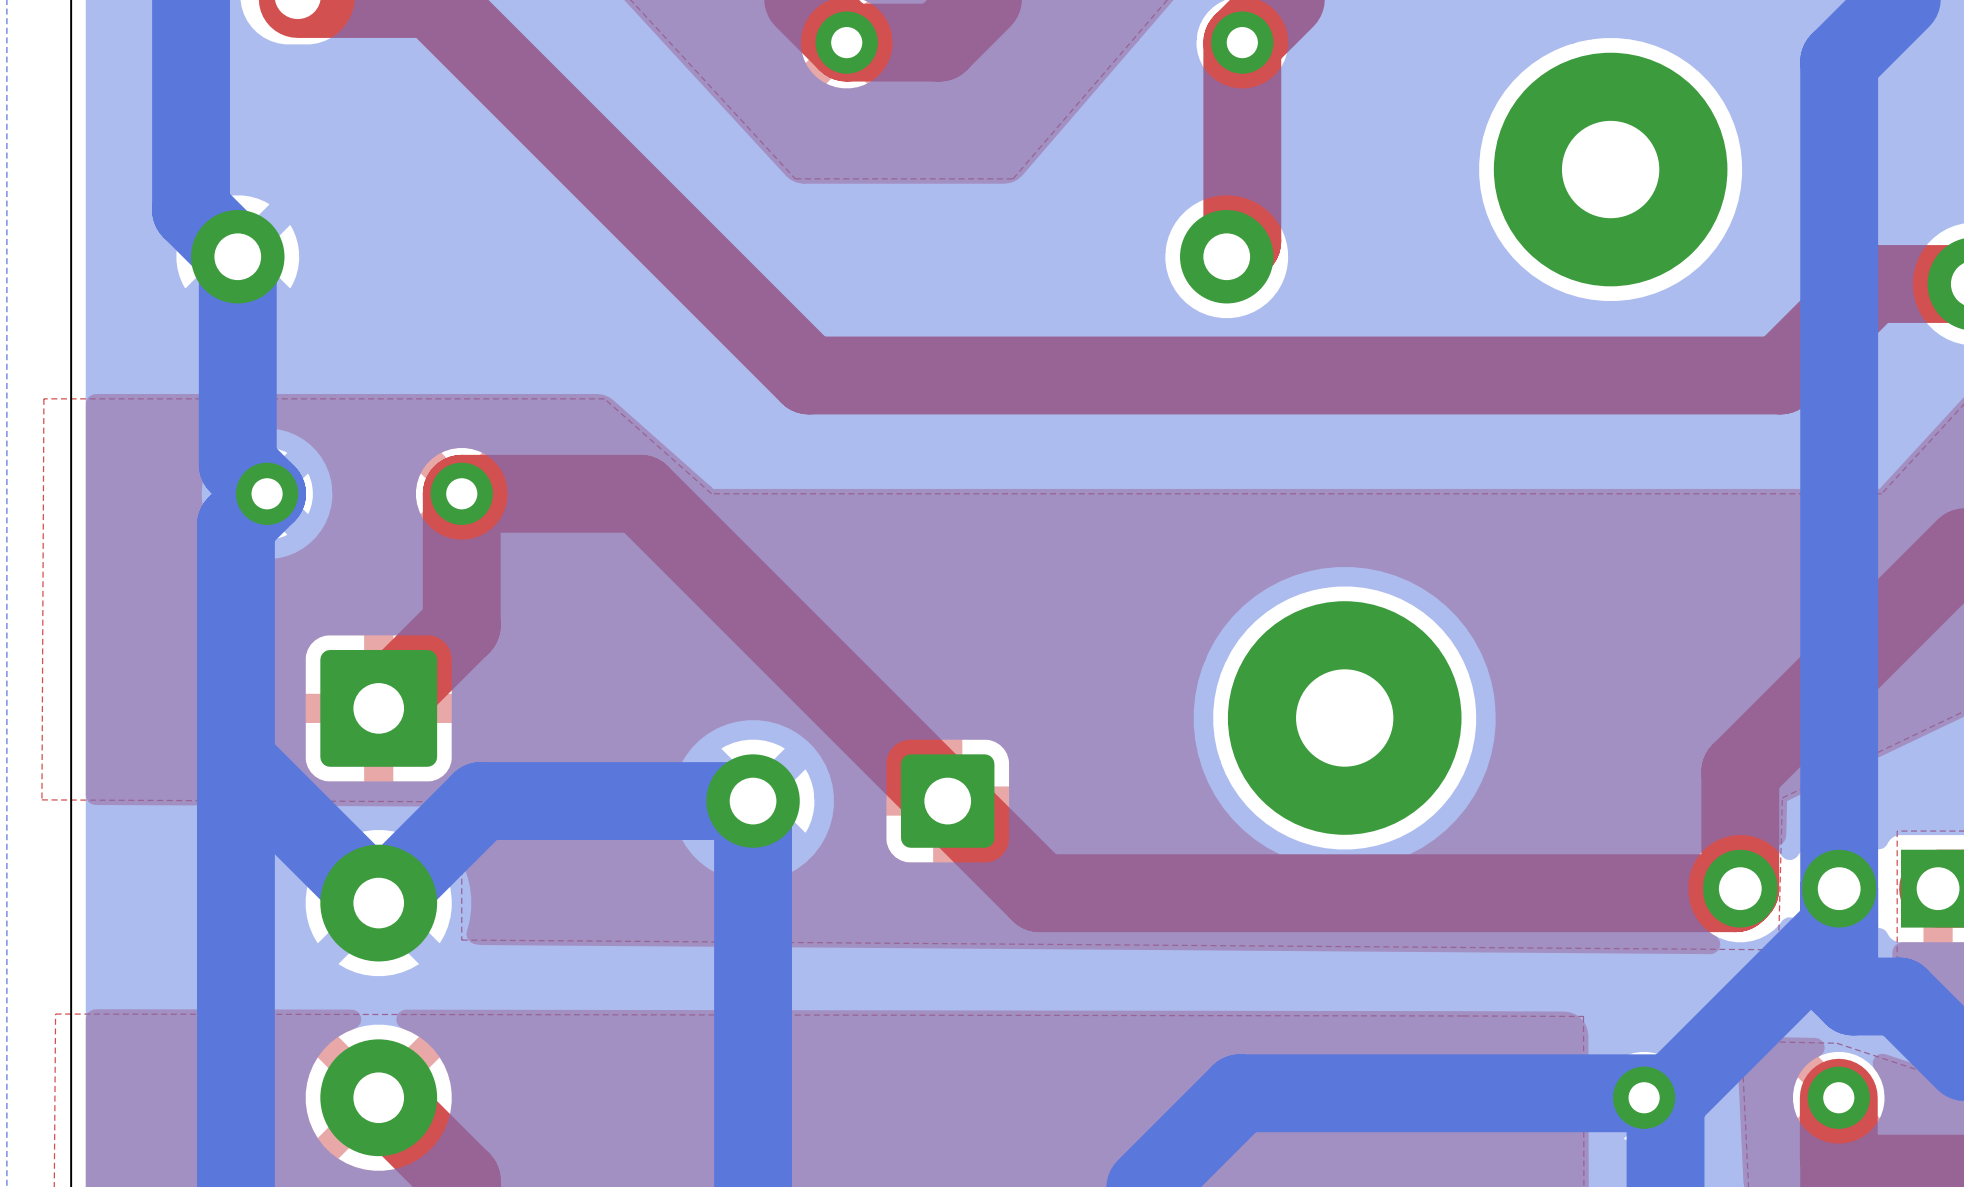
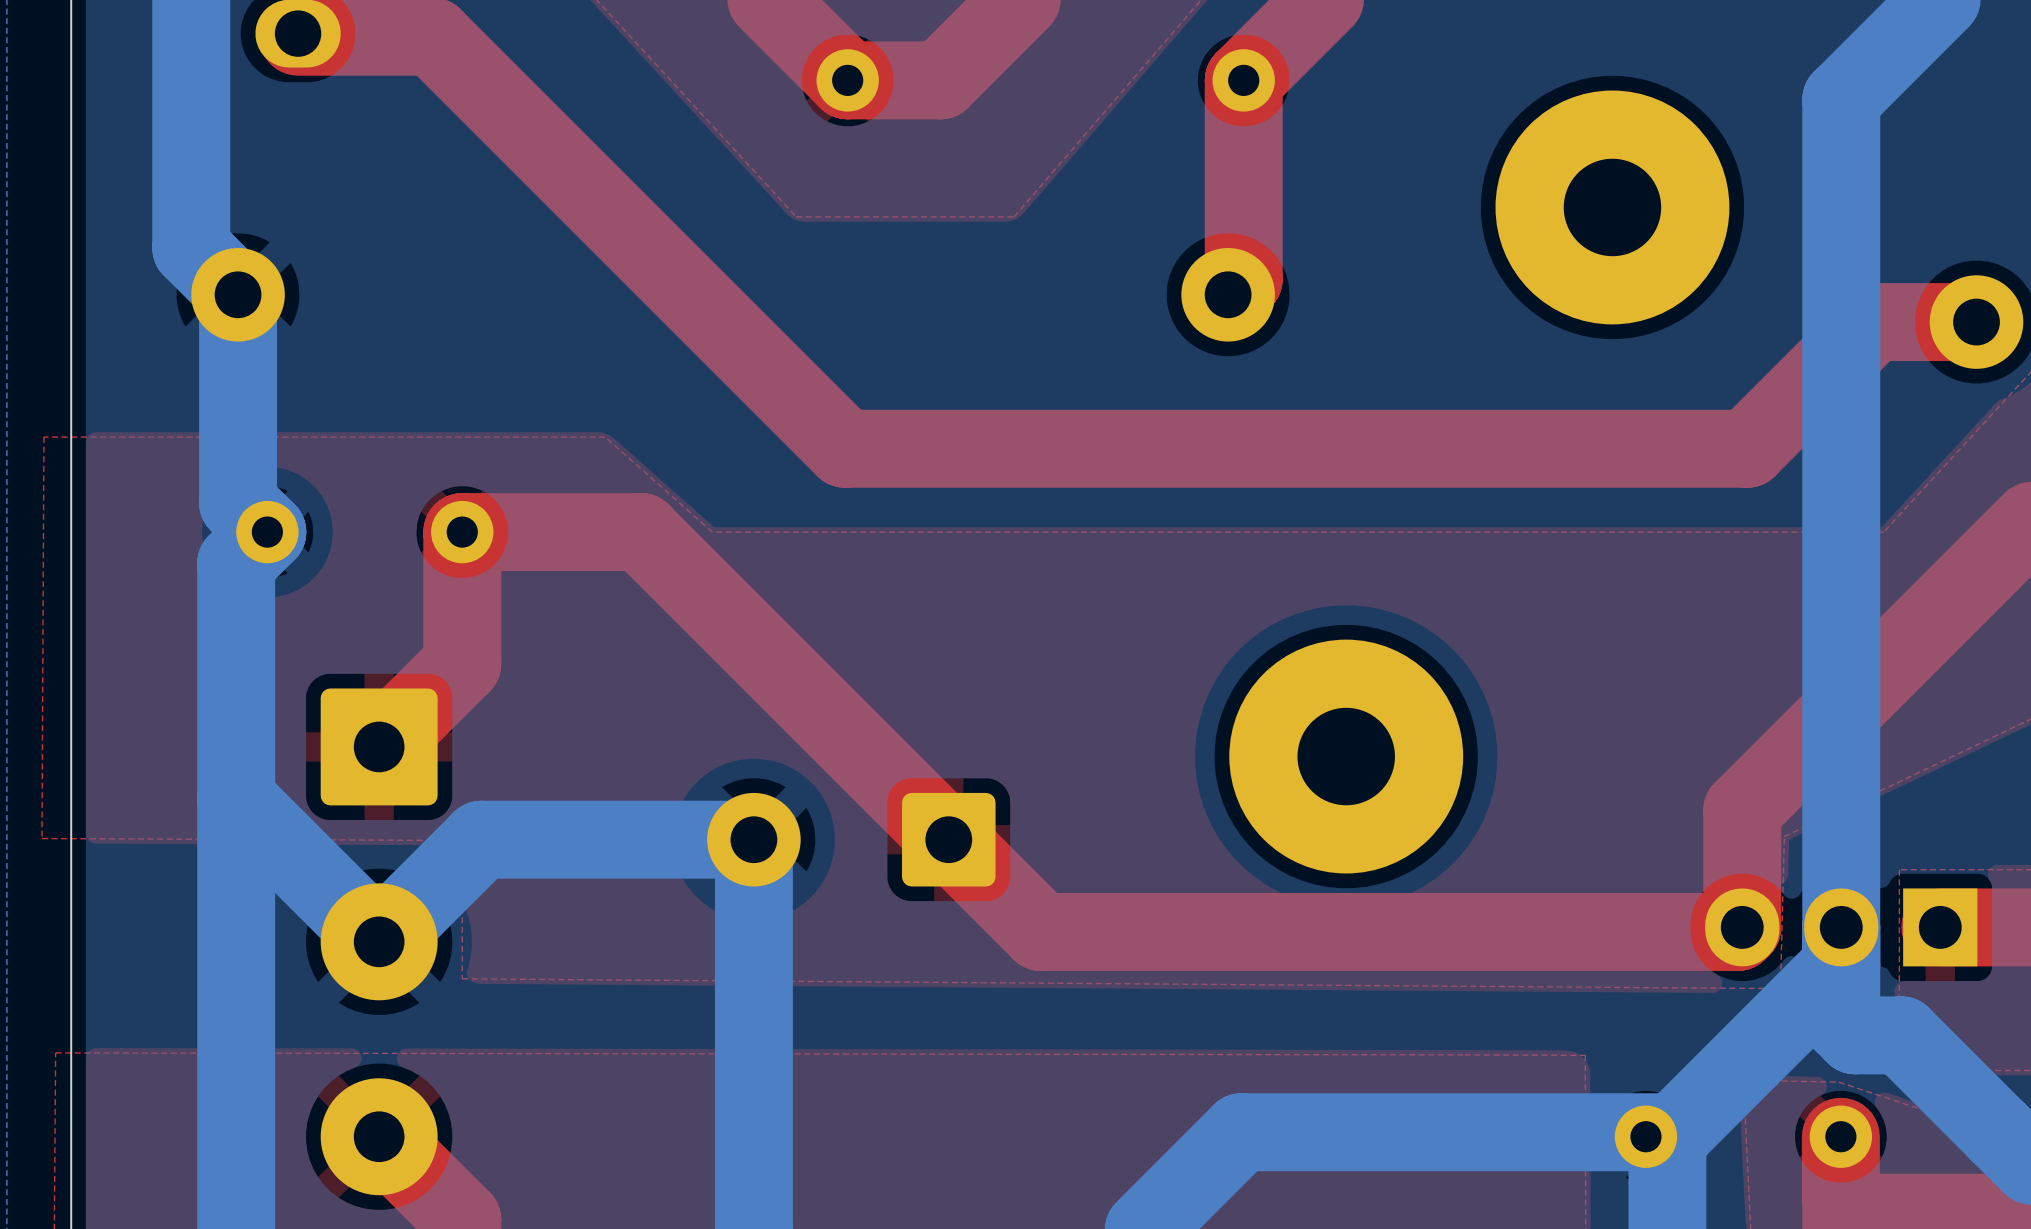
top track: (1780, 375) (808, 375) -> (1782, 413) (1747, 448) (844, 448) (809, 413)

